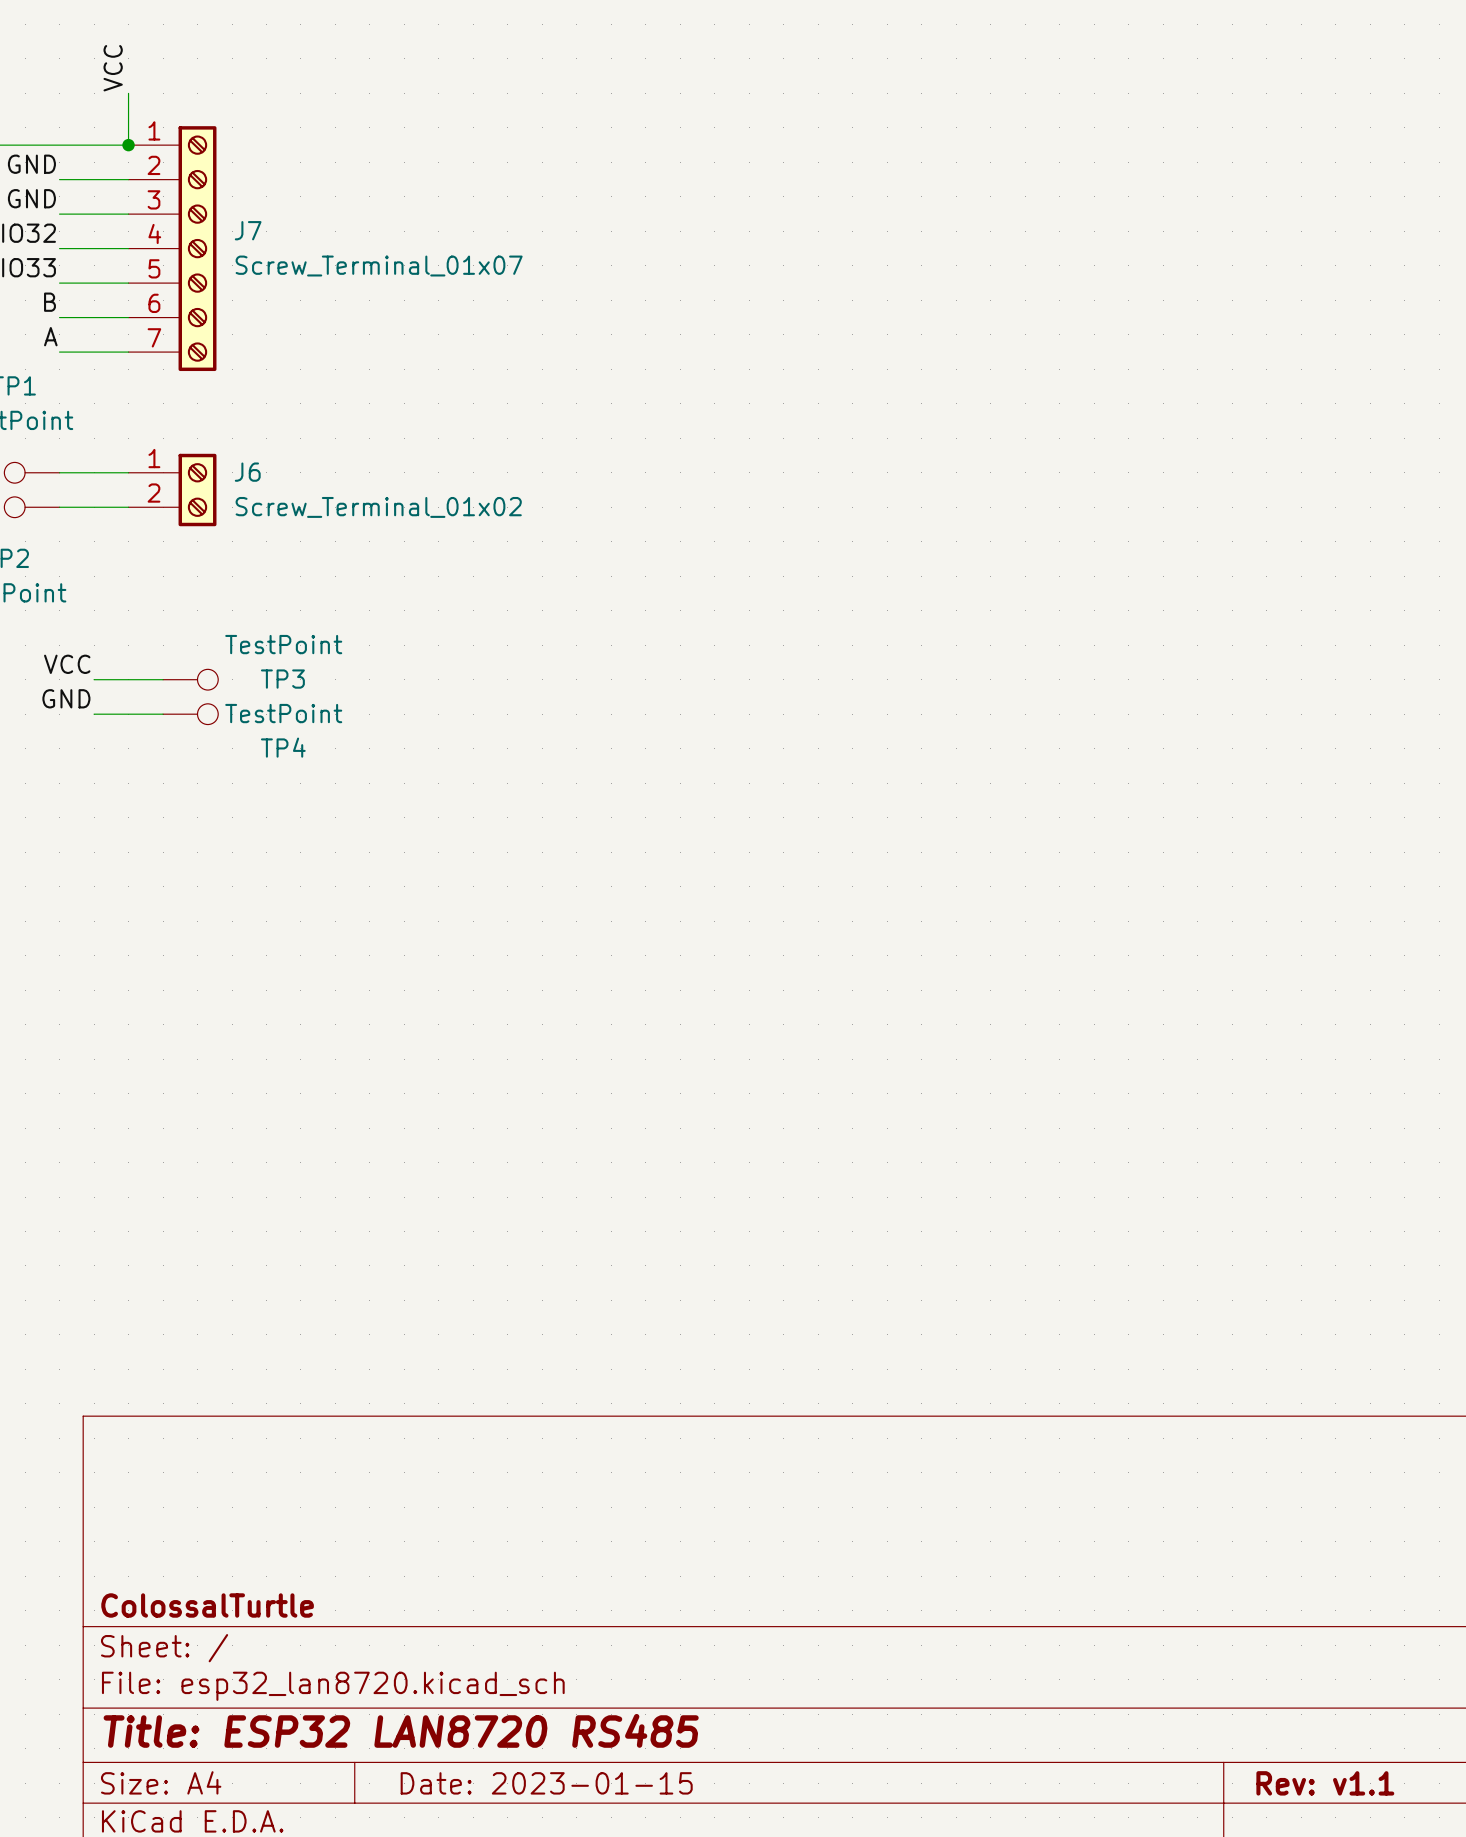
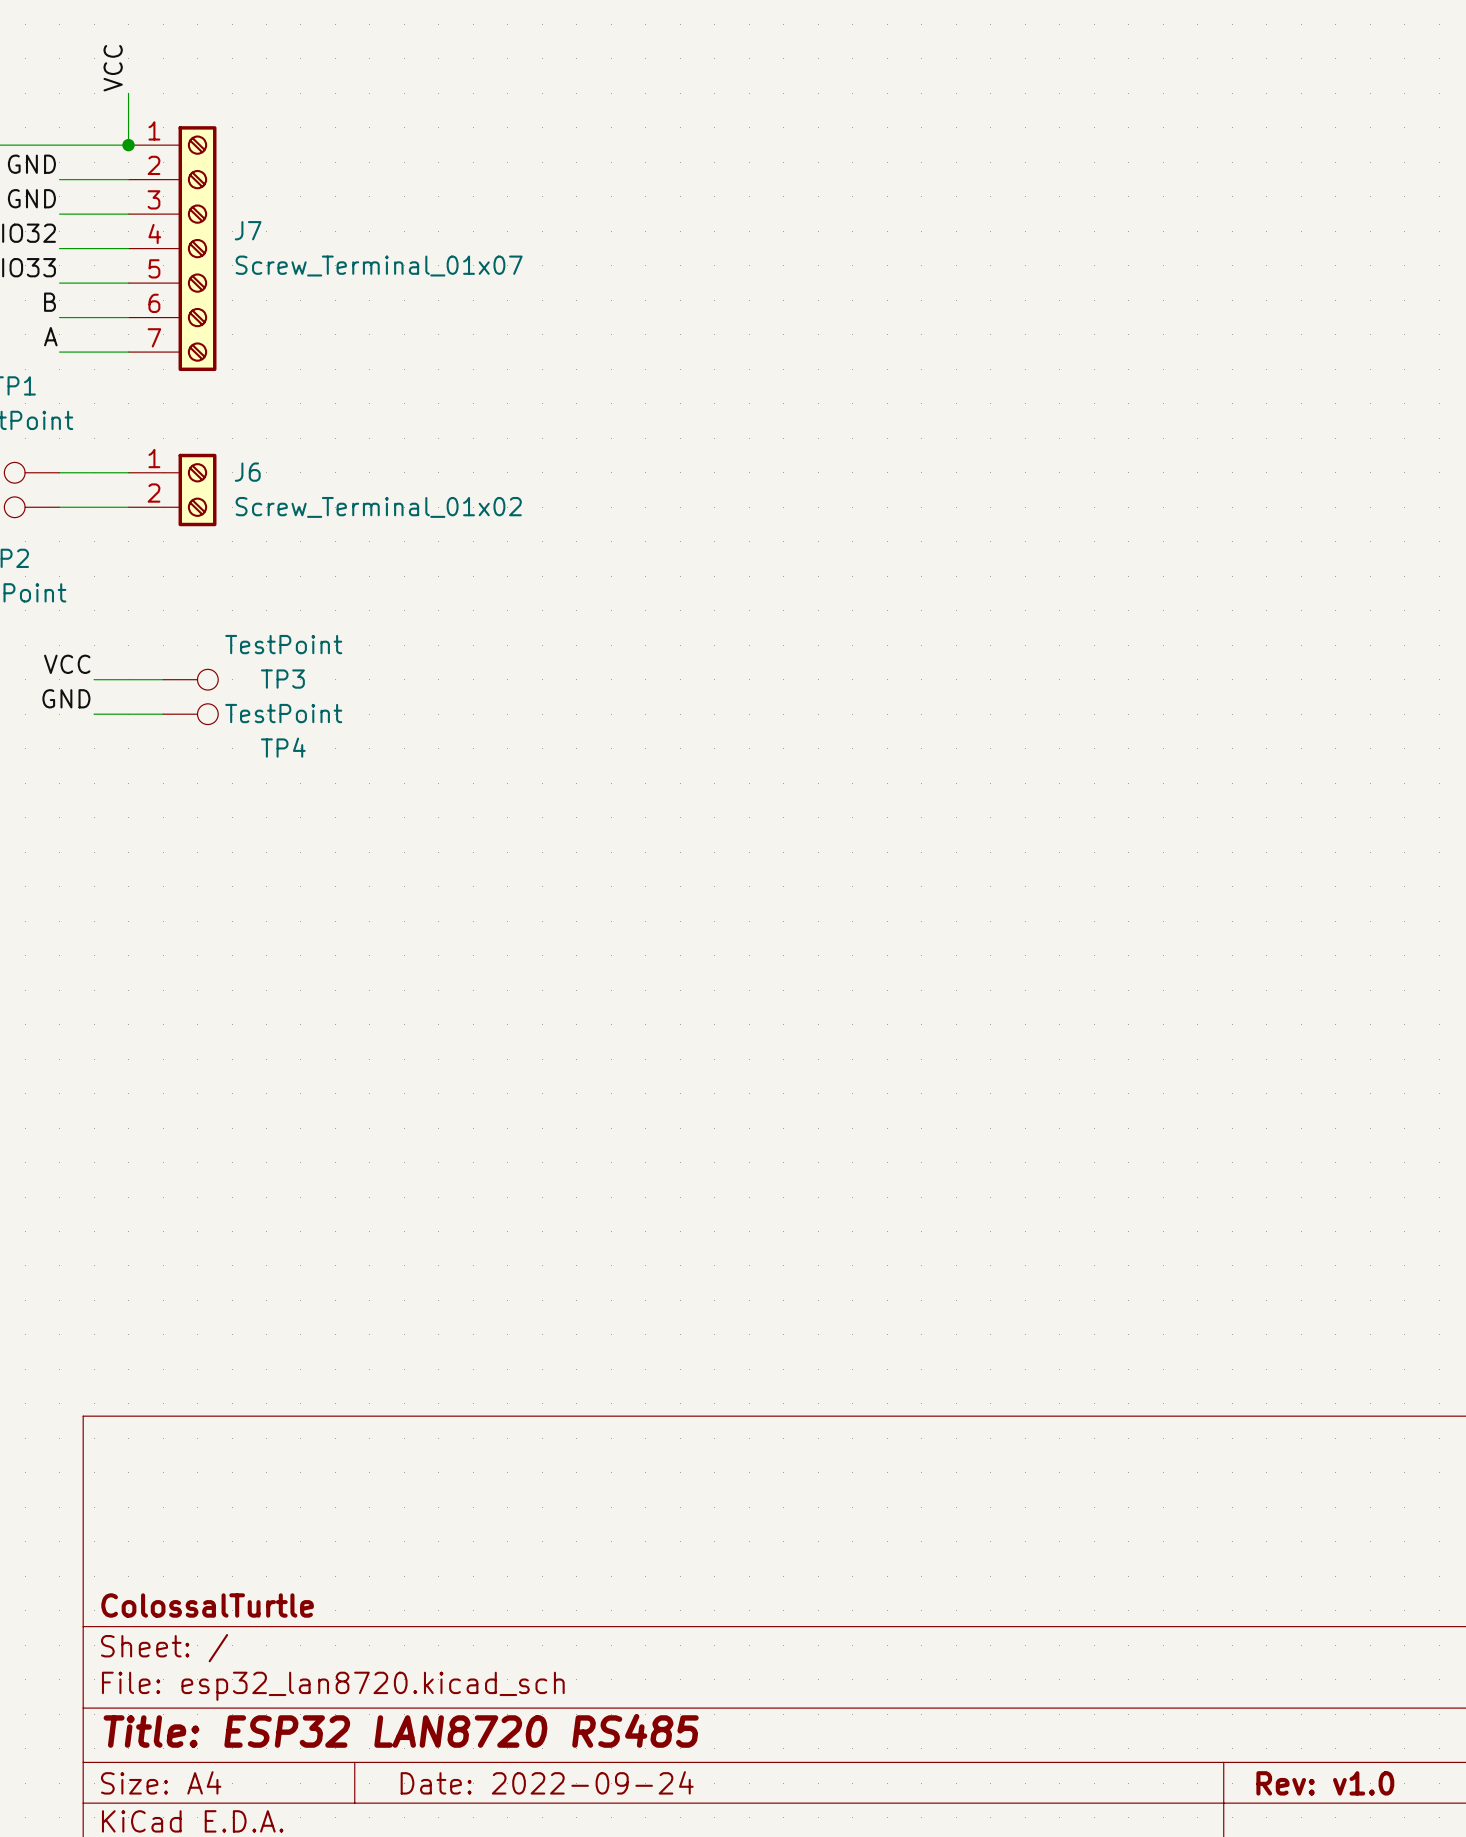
title block: Date: 2023-01-15 (546, 1783) -> Date: 2022-09-24 (547, 1782)
title block: Rev: v1.1 (1325, 1783) -> Rev: v1.0 (1325, 1783)

